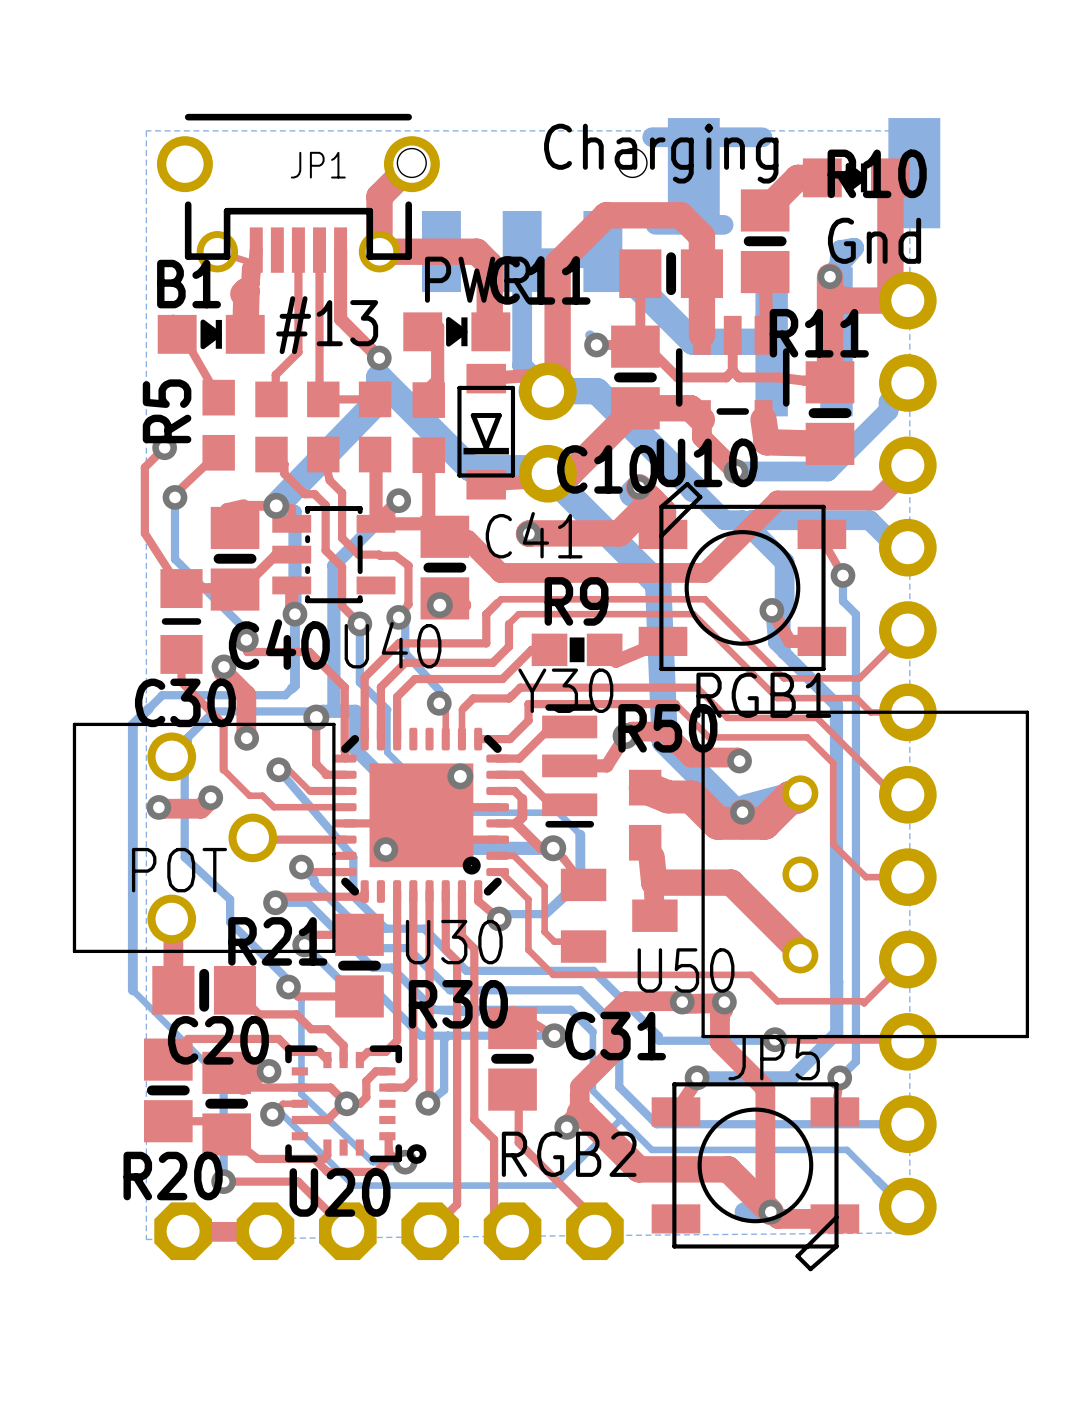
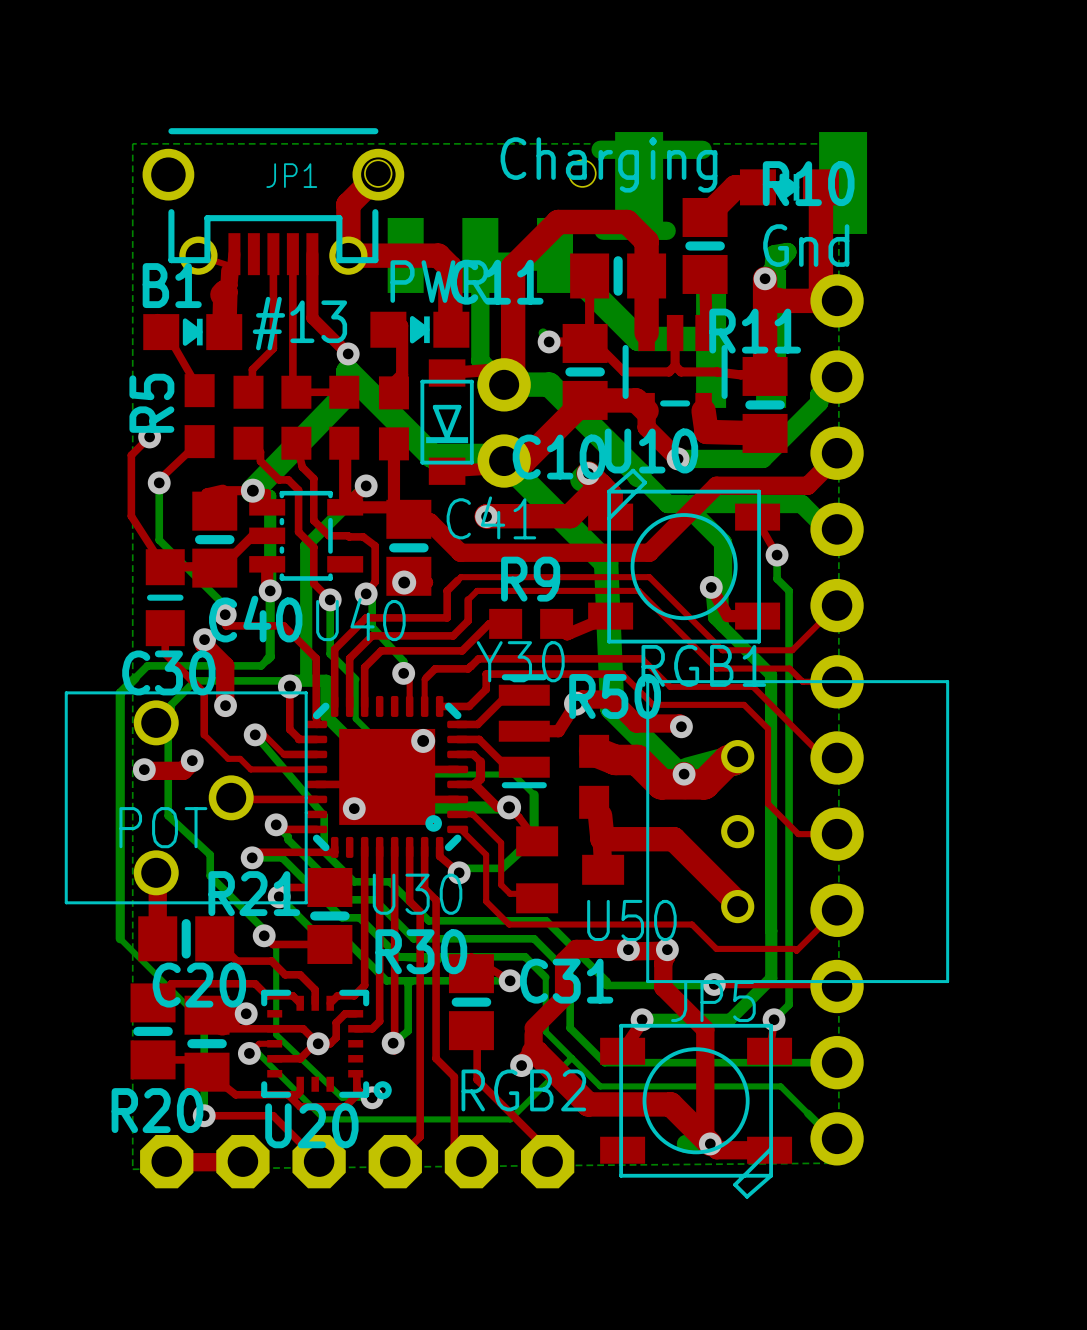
R9 footprint: [531, 633, 623, 667] -> [489, 608, 574, 639]

